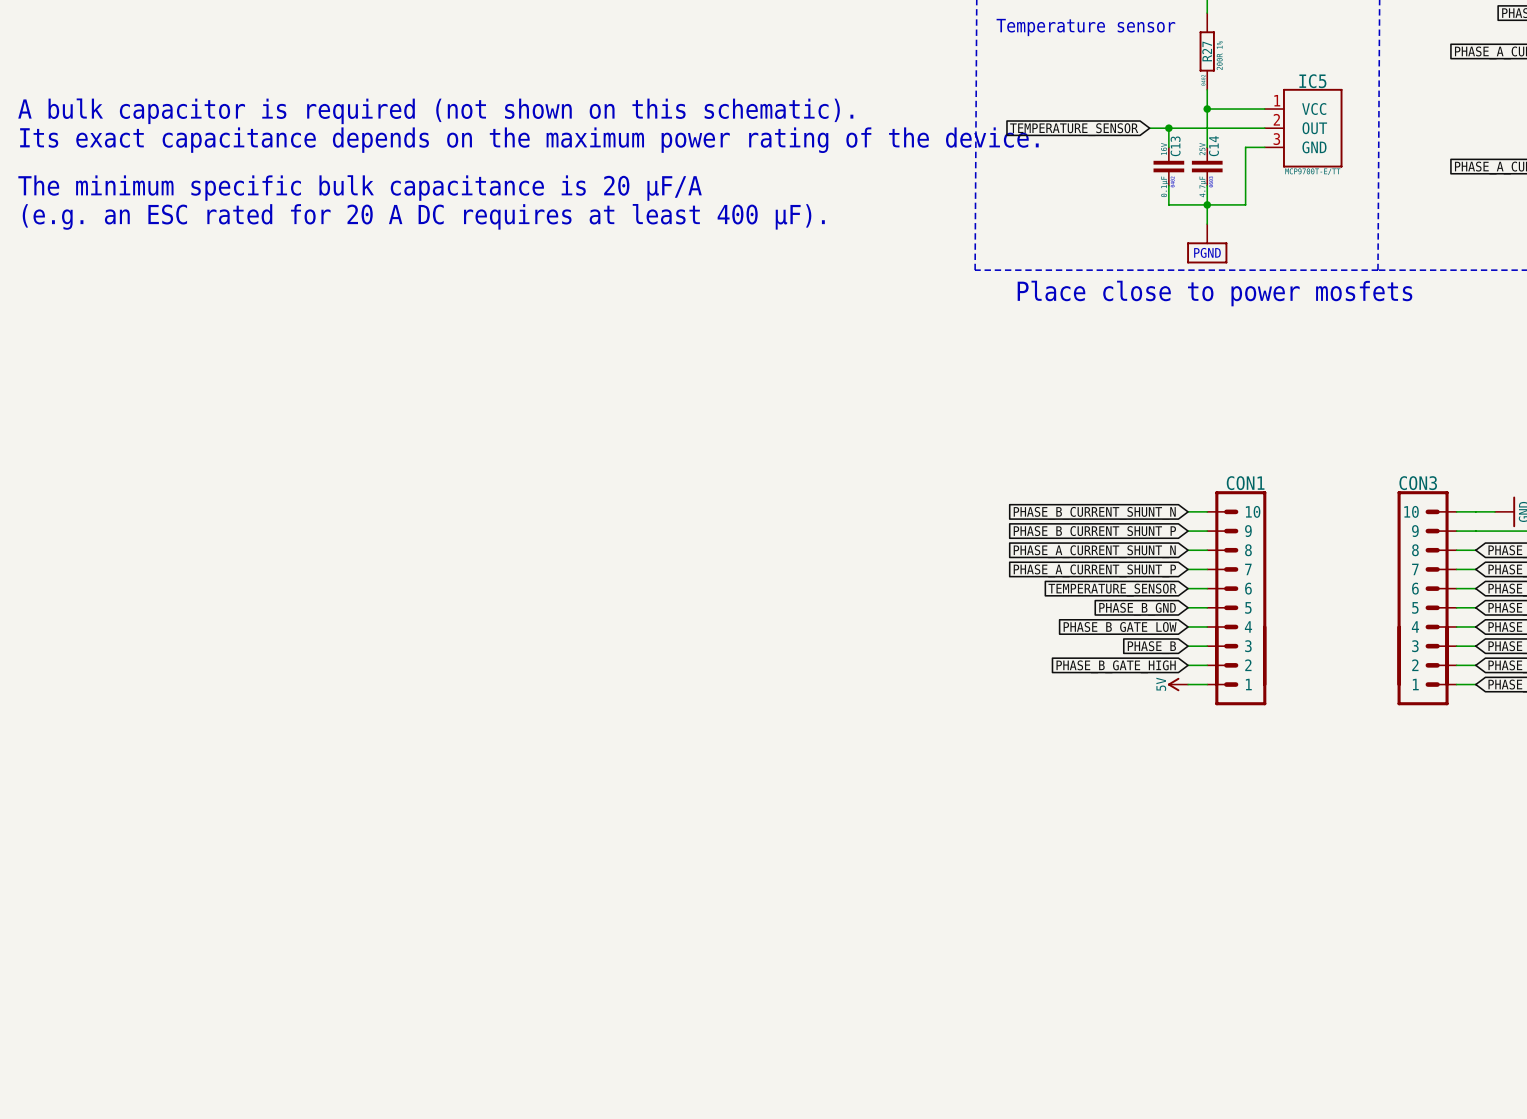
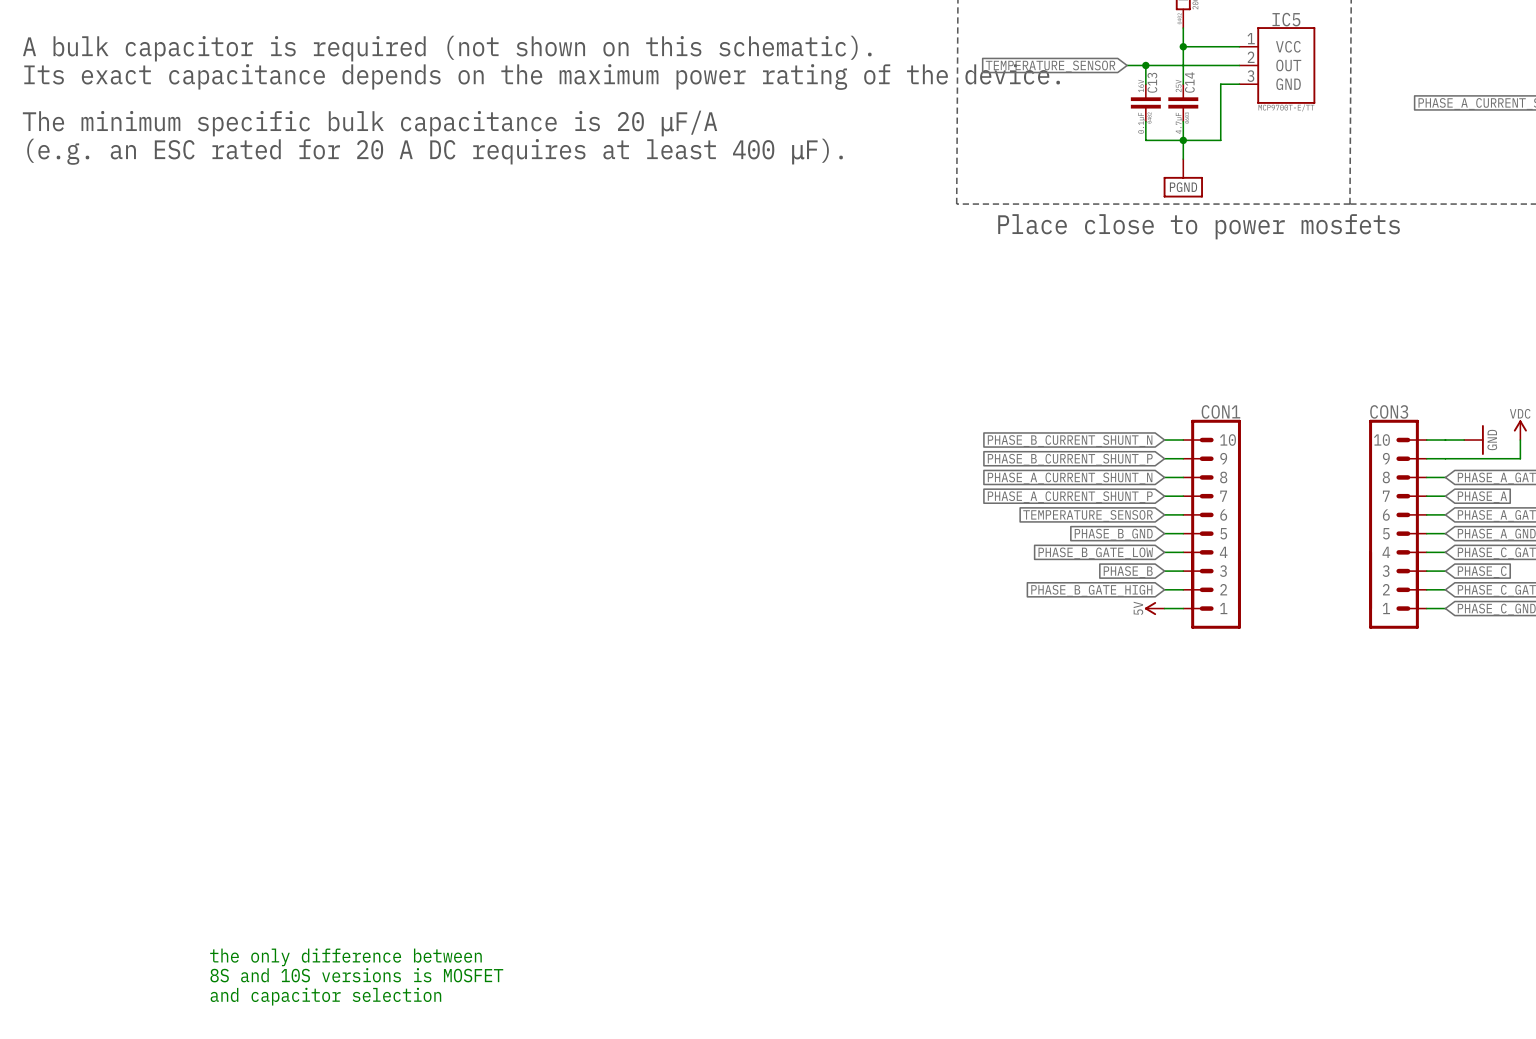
text: none -> the only difference between (345, 957)
text: none -> 8S and 10S versions is MOSFET (356, 975)
text: none -> and capacitor selection (325, 996)

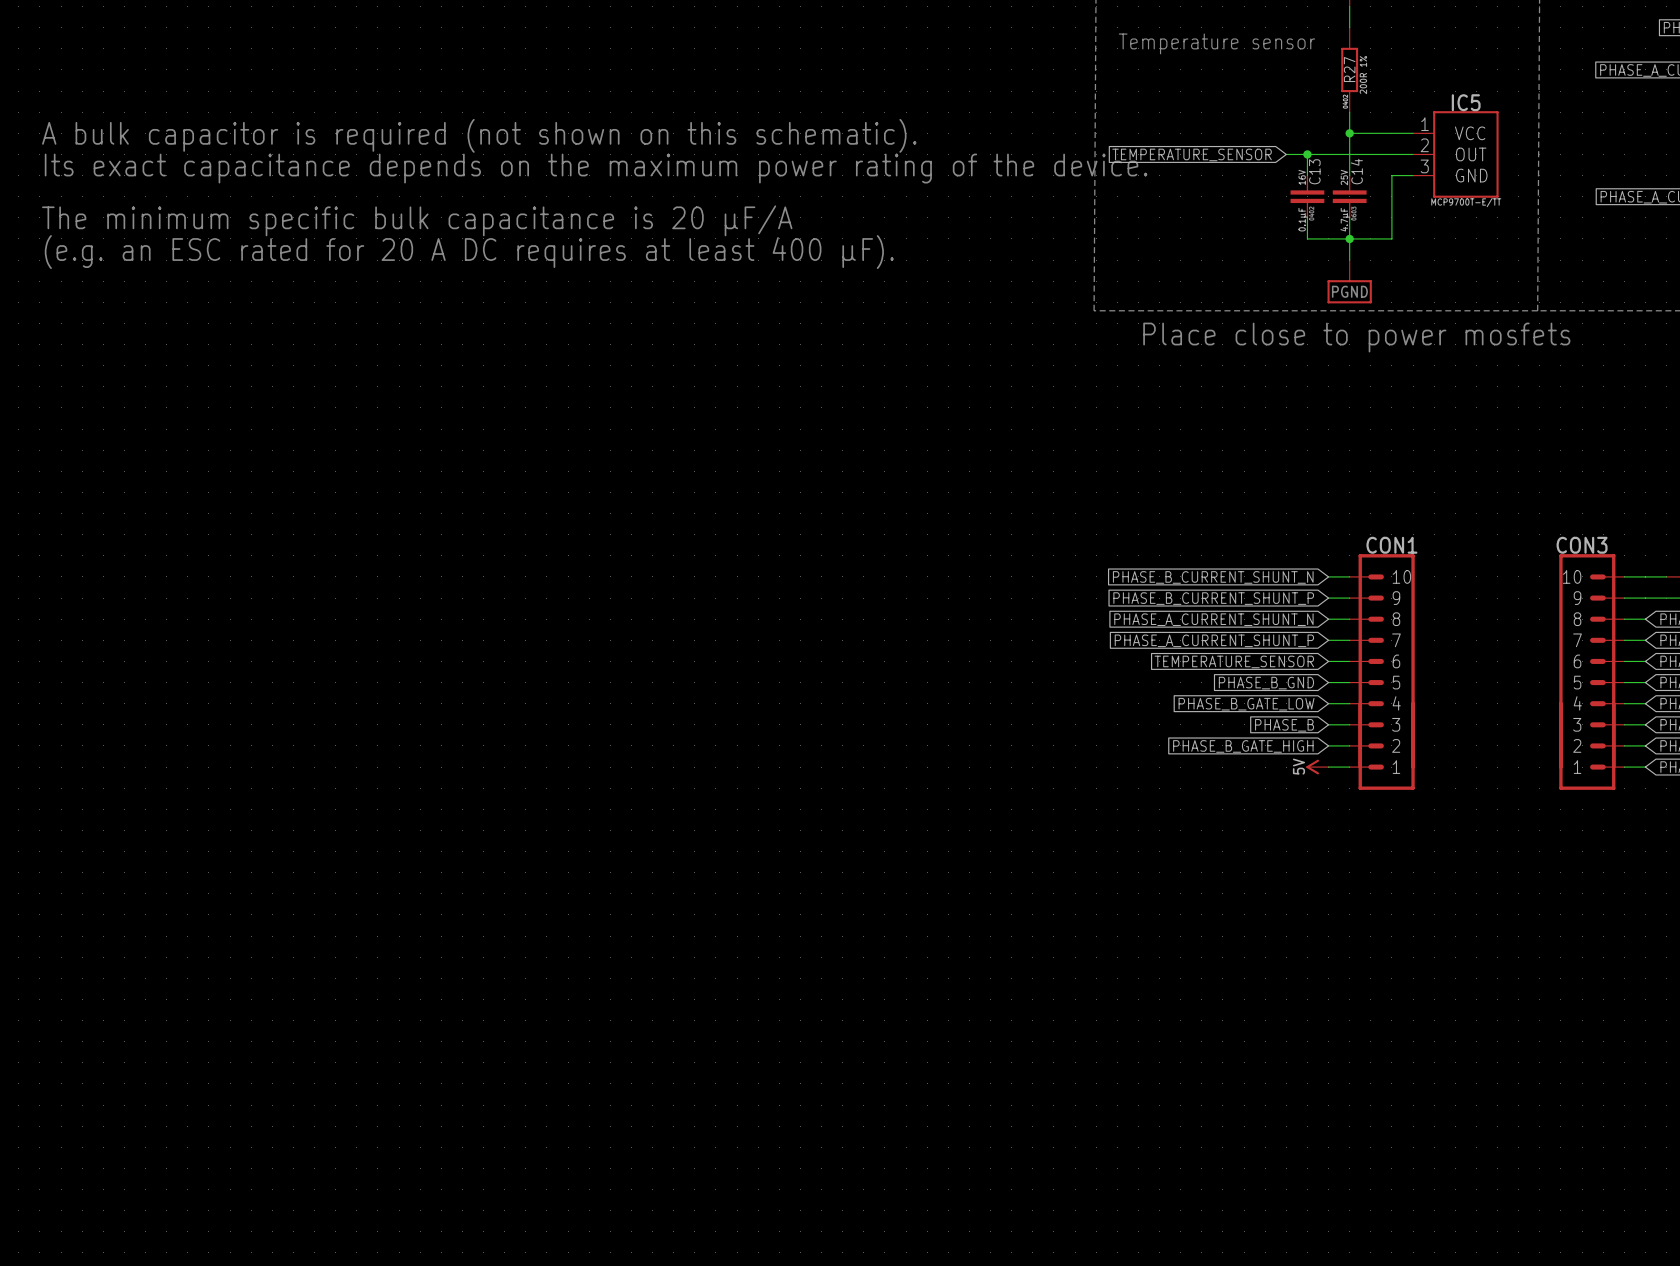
text: the only difference between (345, 957) -> none
text: 8S and 10S versions is MOSFET (356, 975) -> none
text: and capacitor selection (325, 996) -> none

